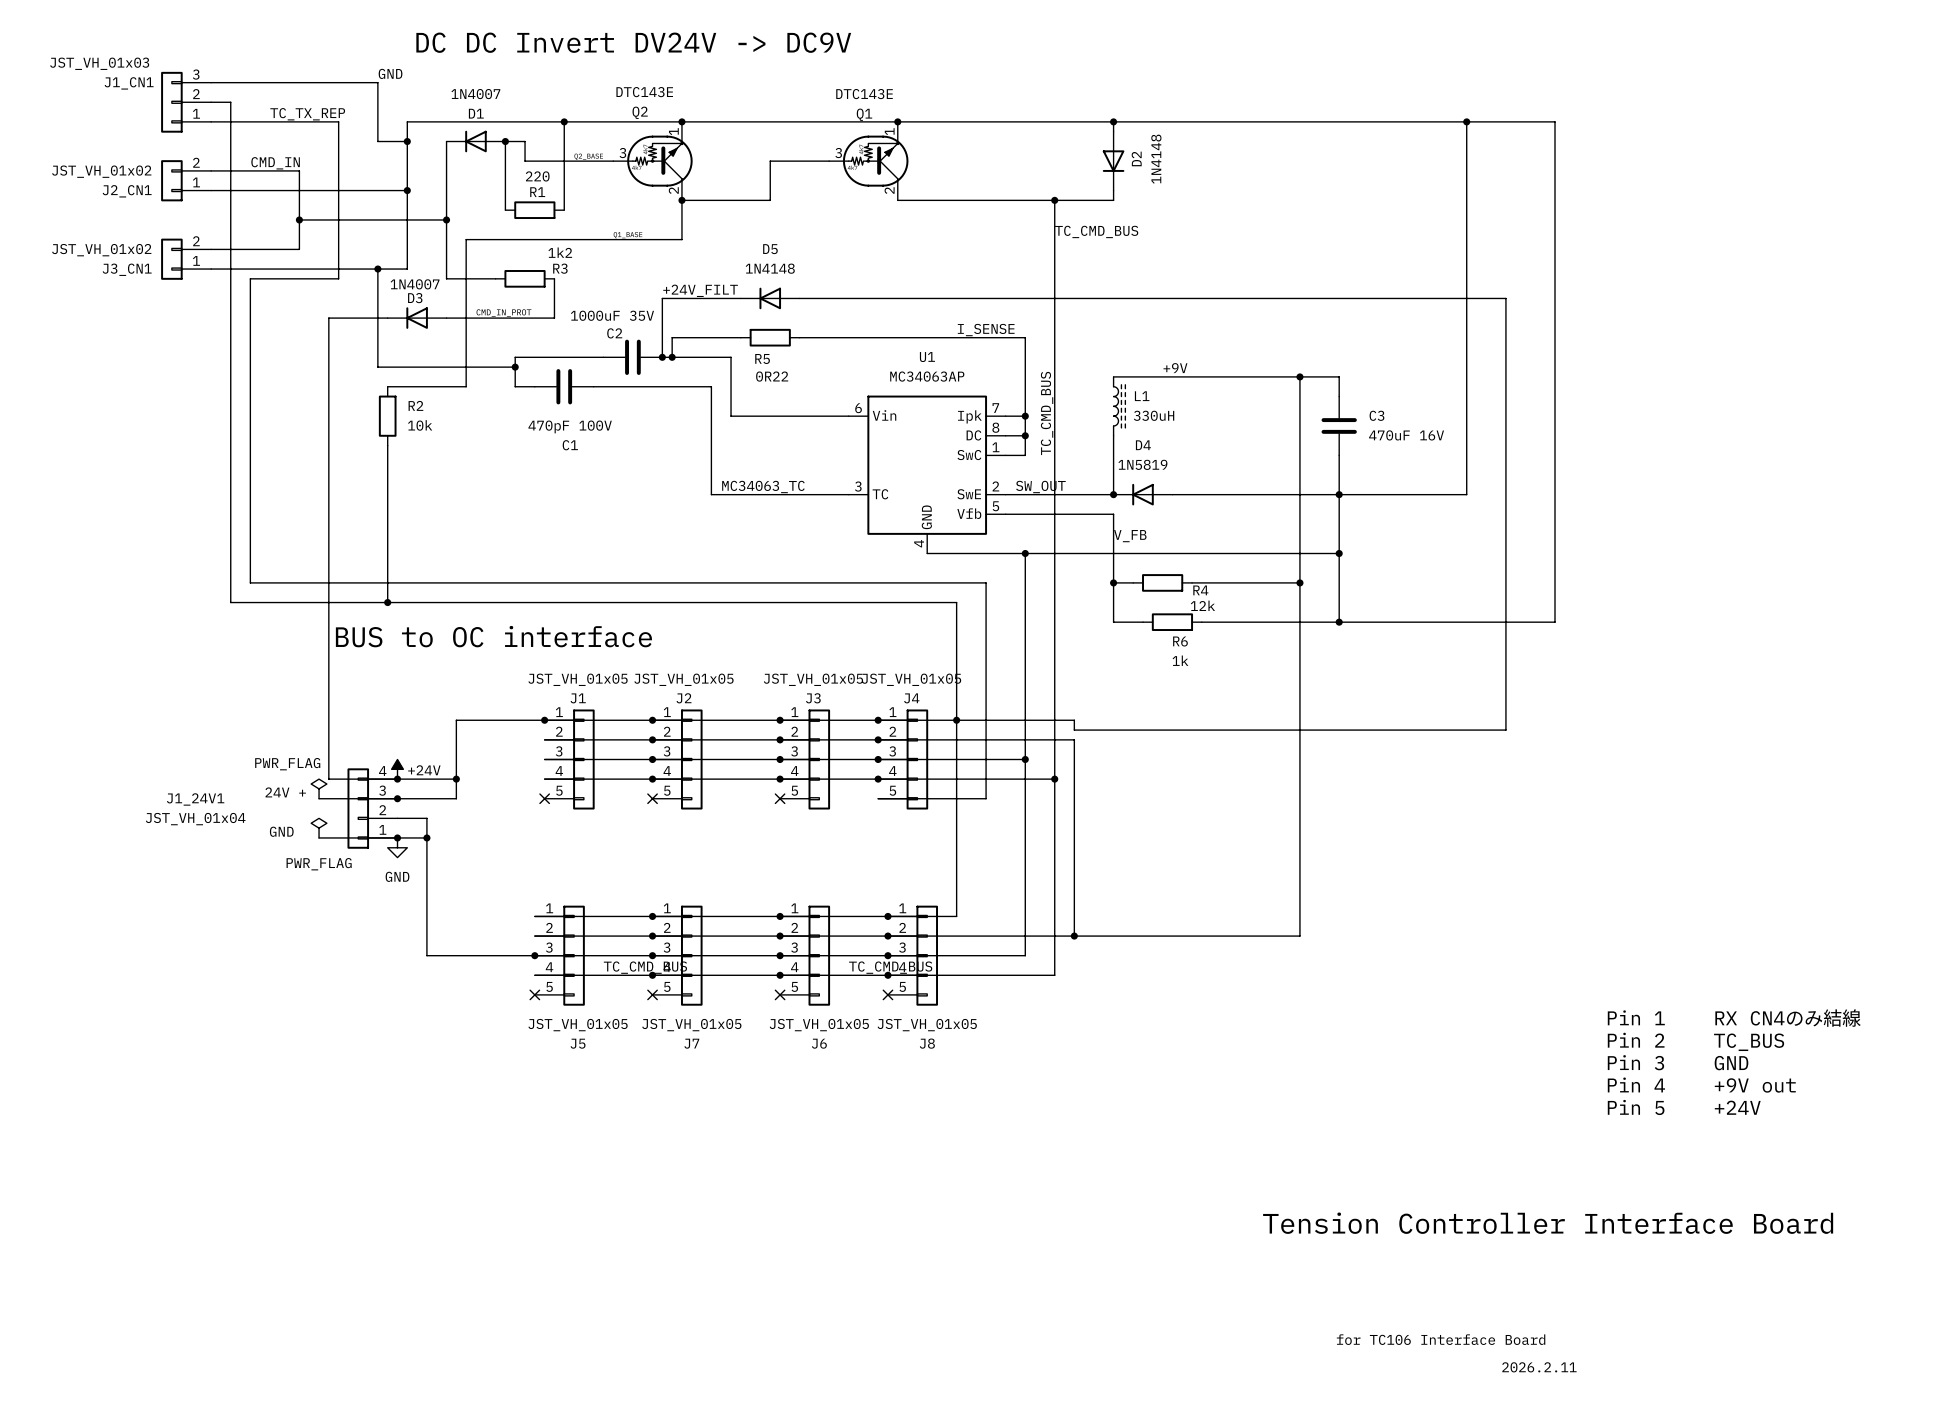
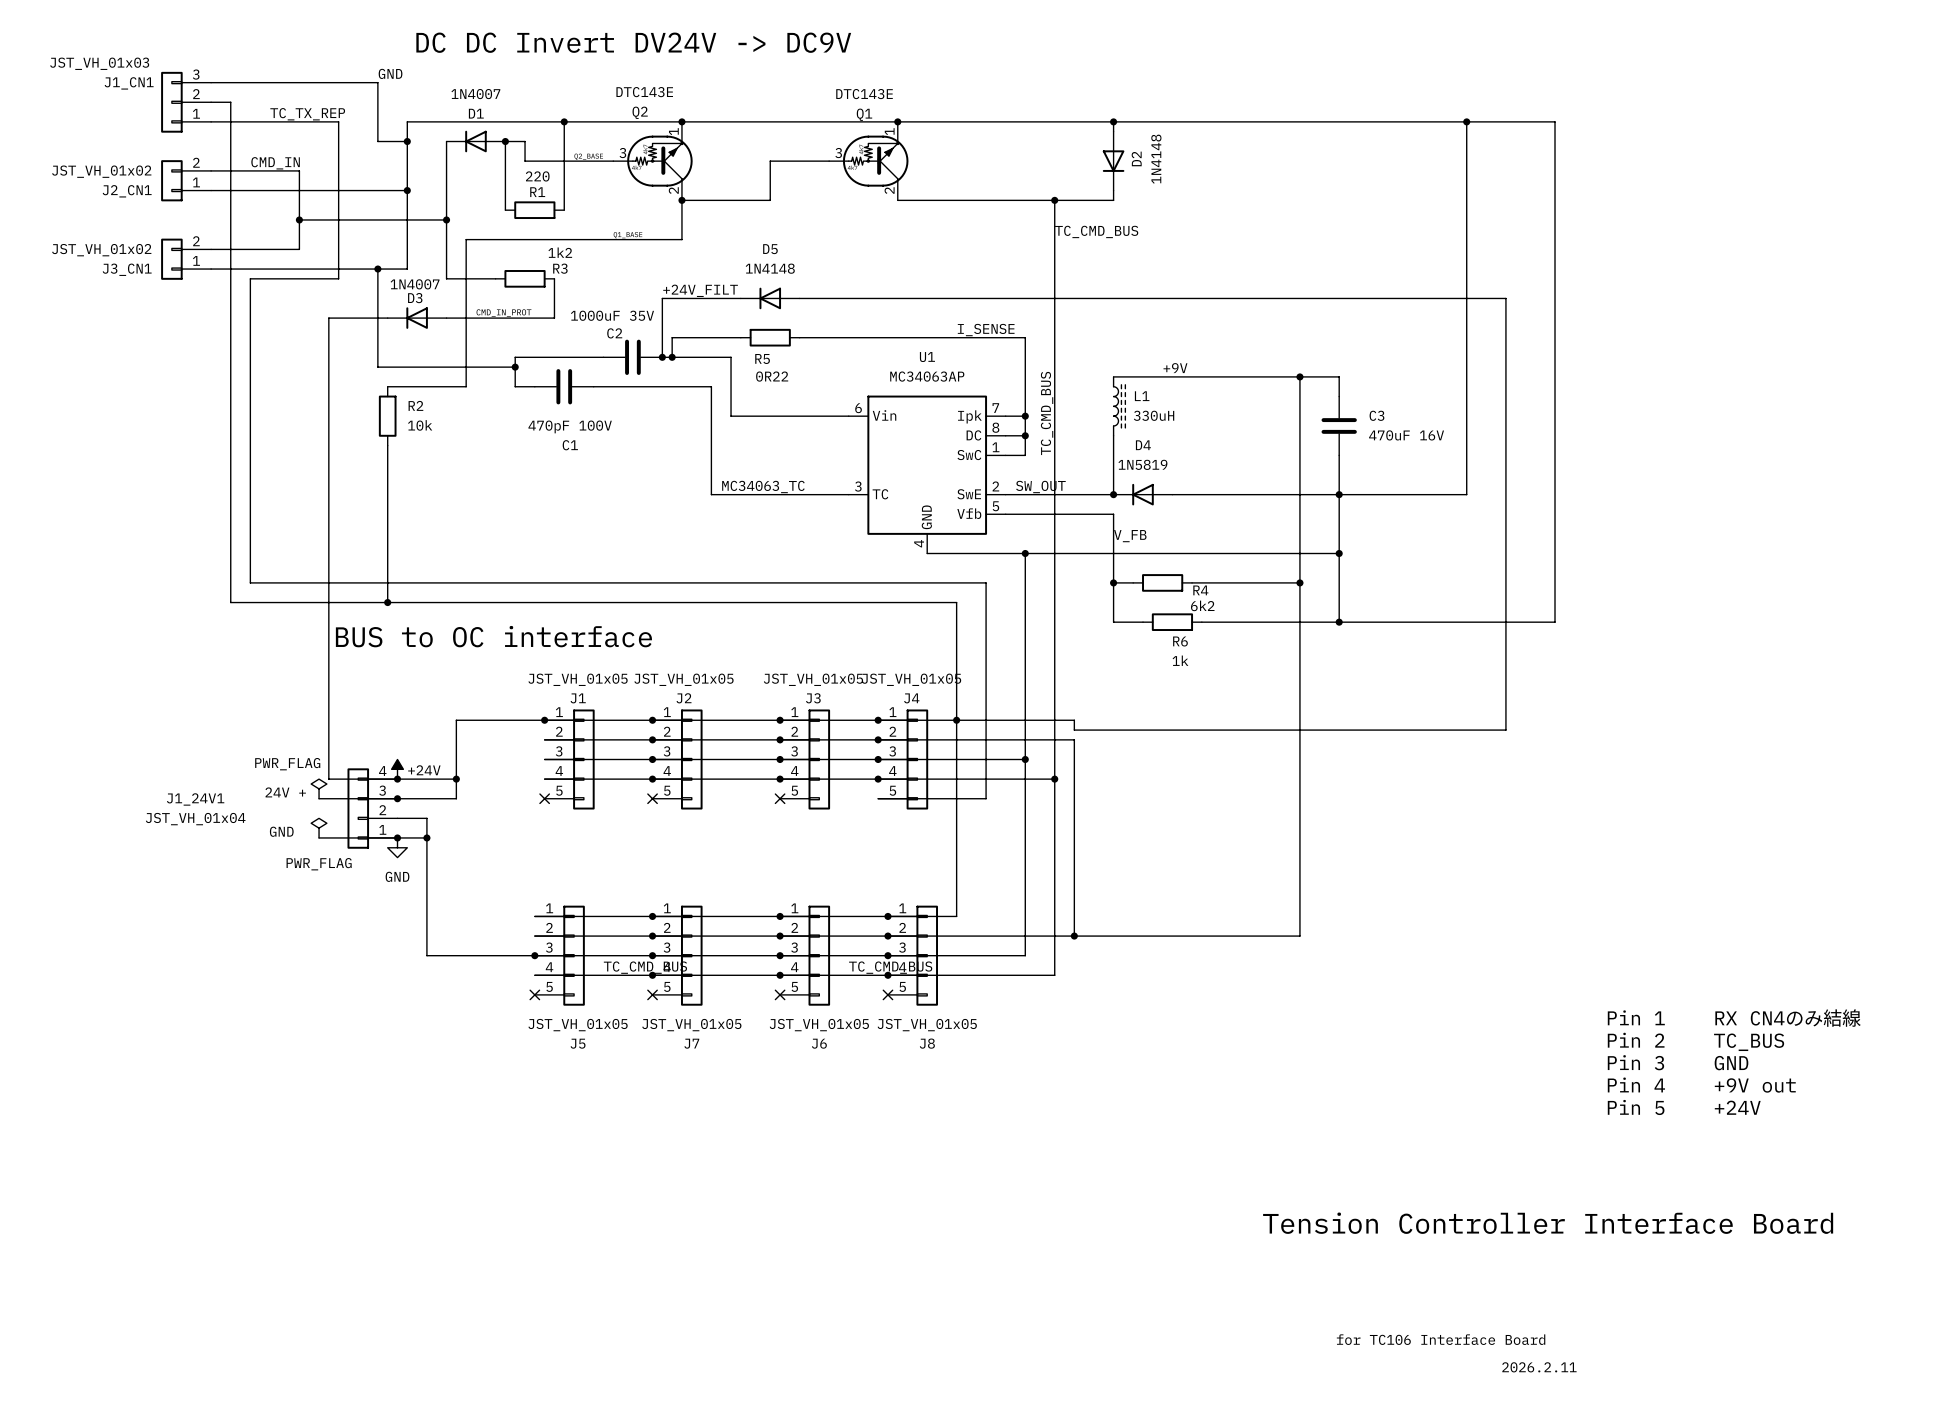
R4 value: 12k (1202, 605) -> 6k2 (1202, 605)

